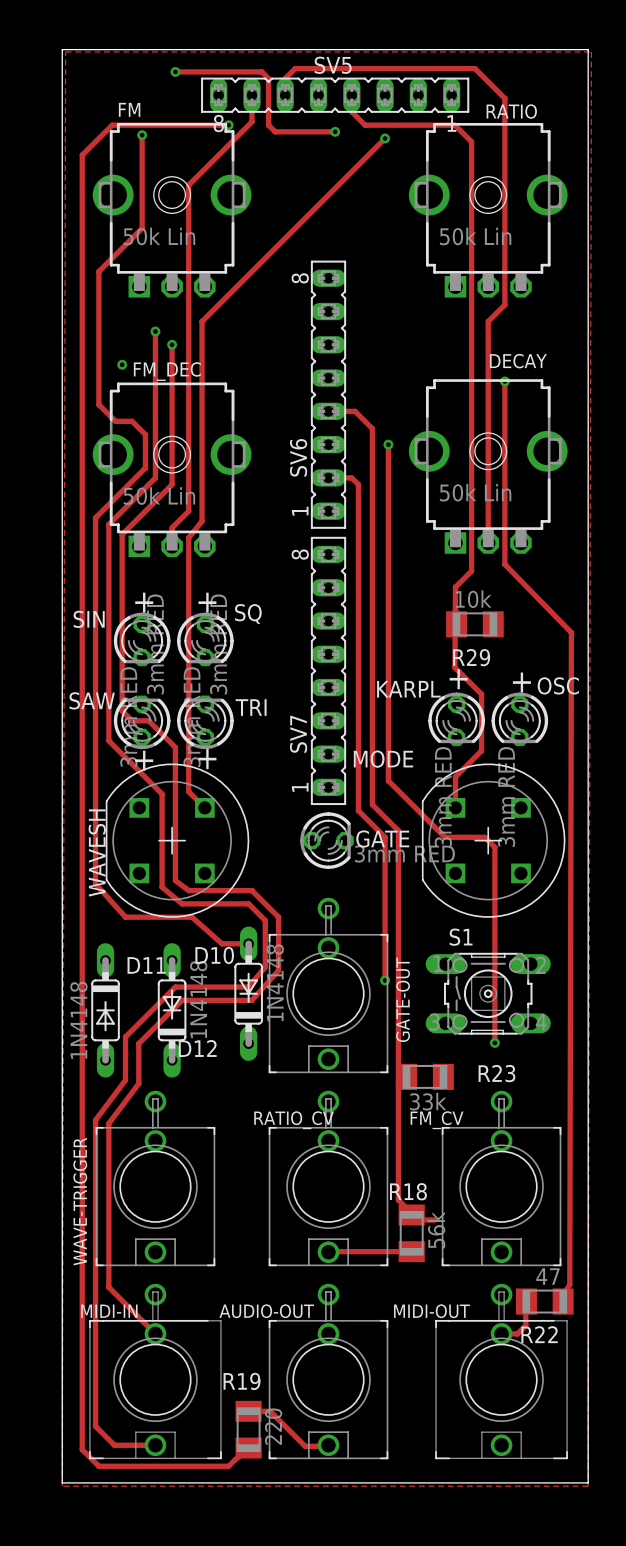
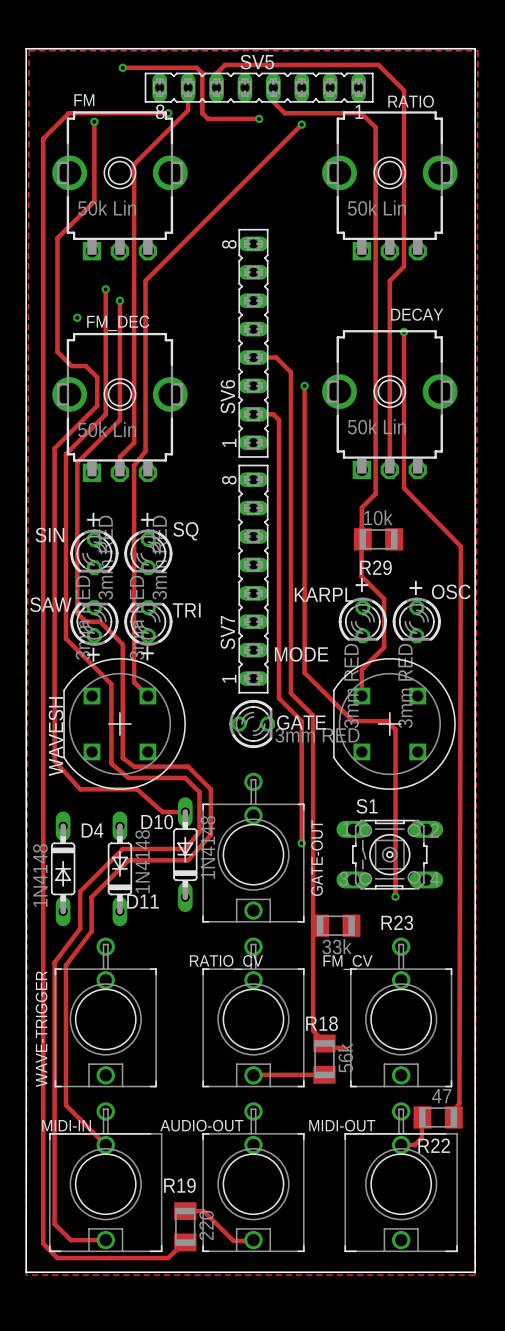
D11 name: D11 (146, 965) -> D4 (92, 830)
D12 name: D12 (197, 1048) -> D11 (142, 901)

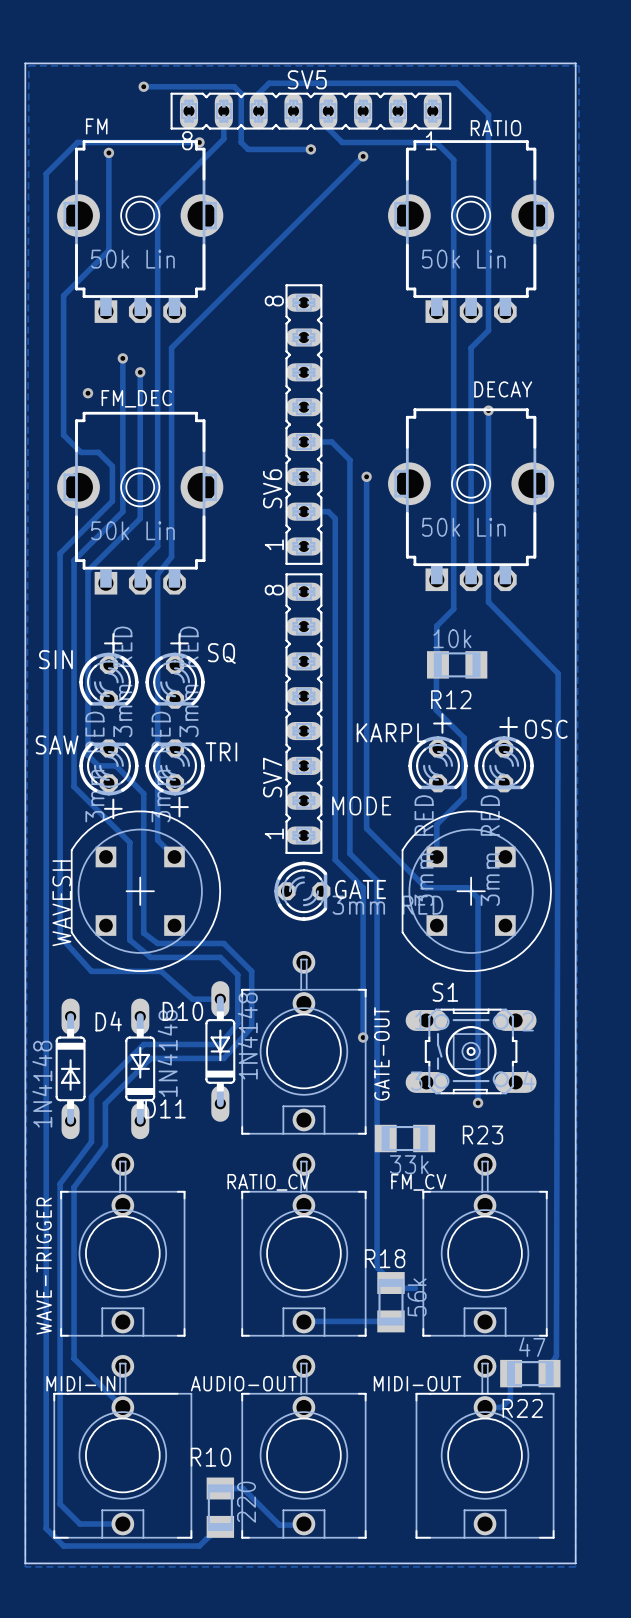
R29 name: R29 (375, 567) -> R12 (451, 699)
R19 name: R19 (179, 1185) -> R10 (210, 1457)

